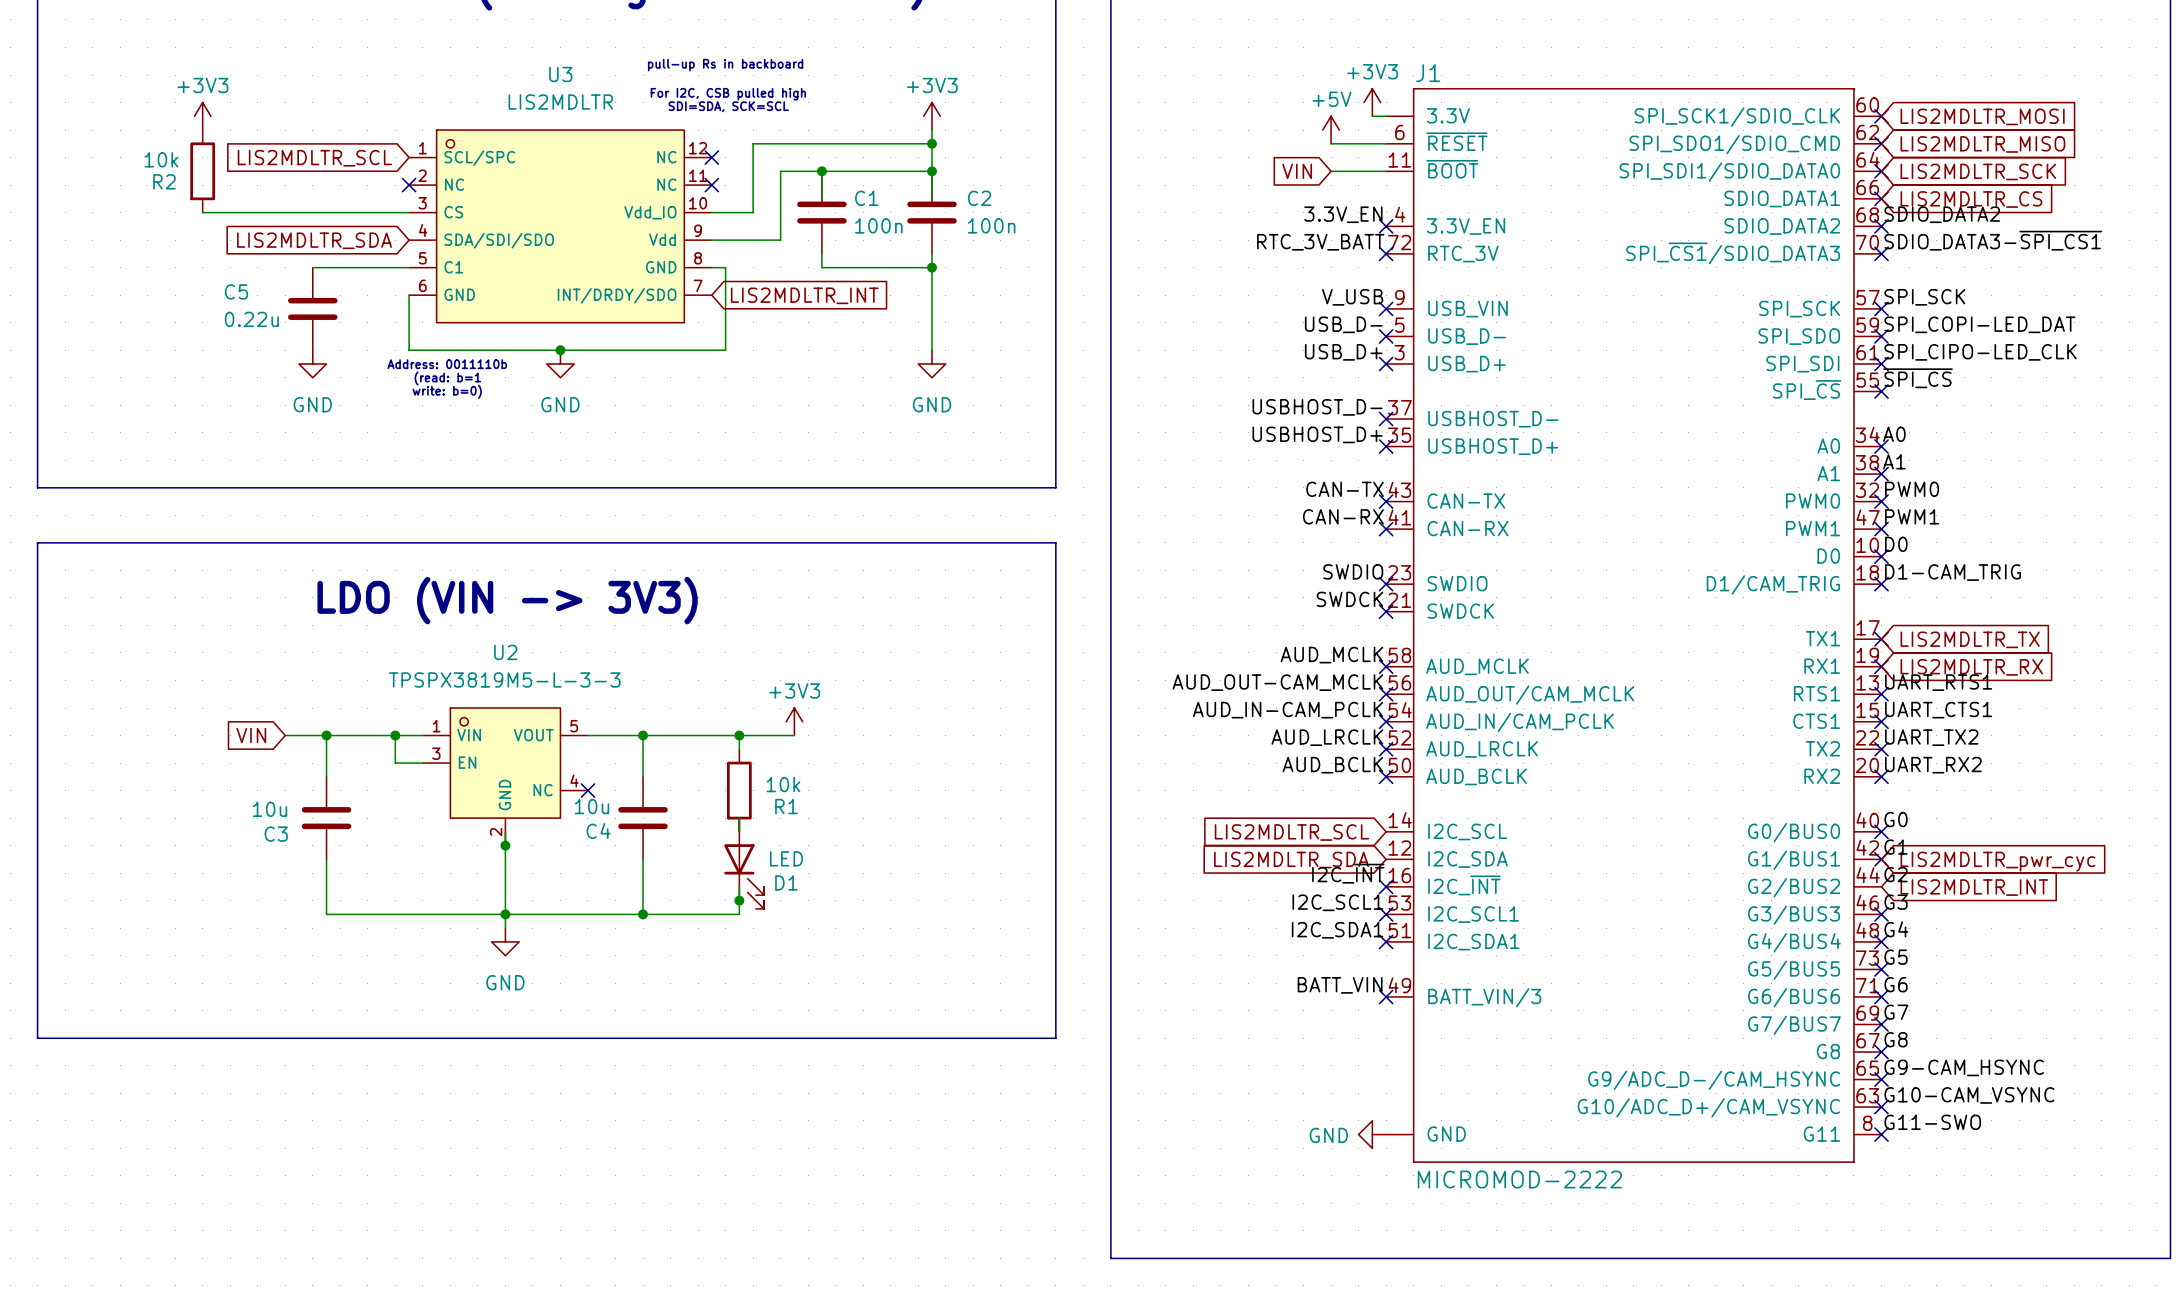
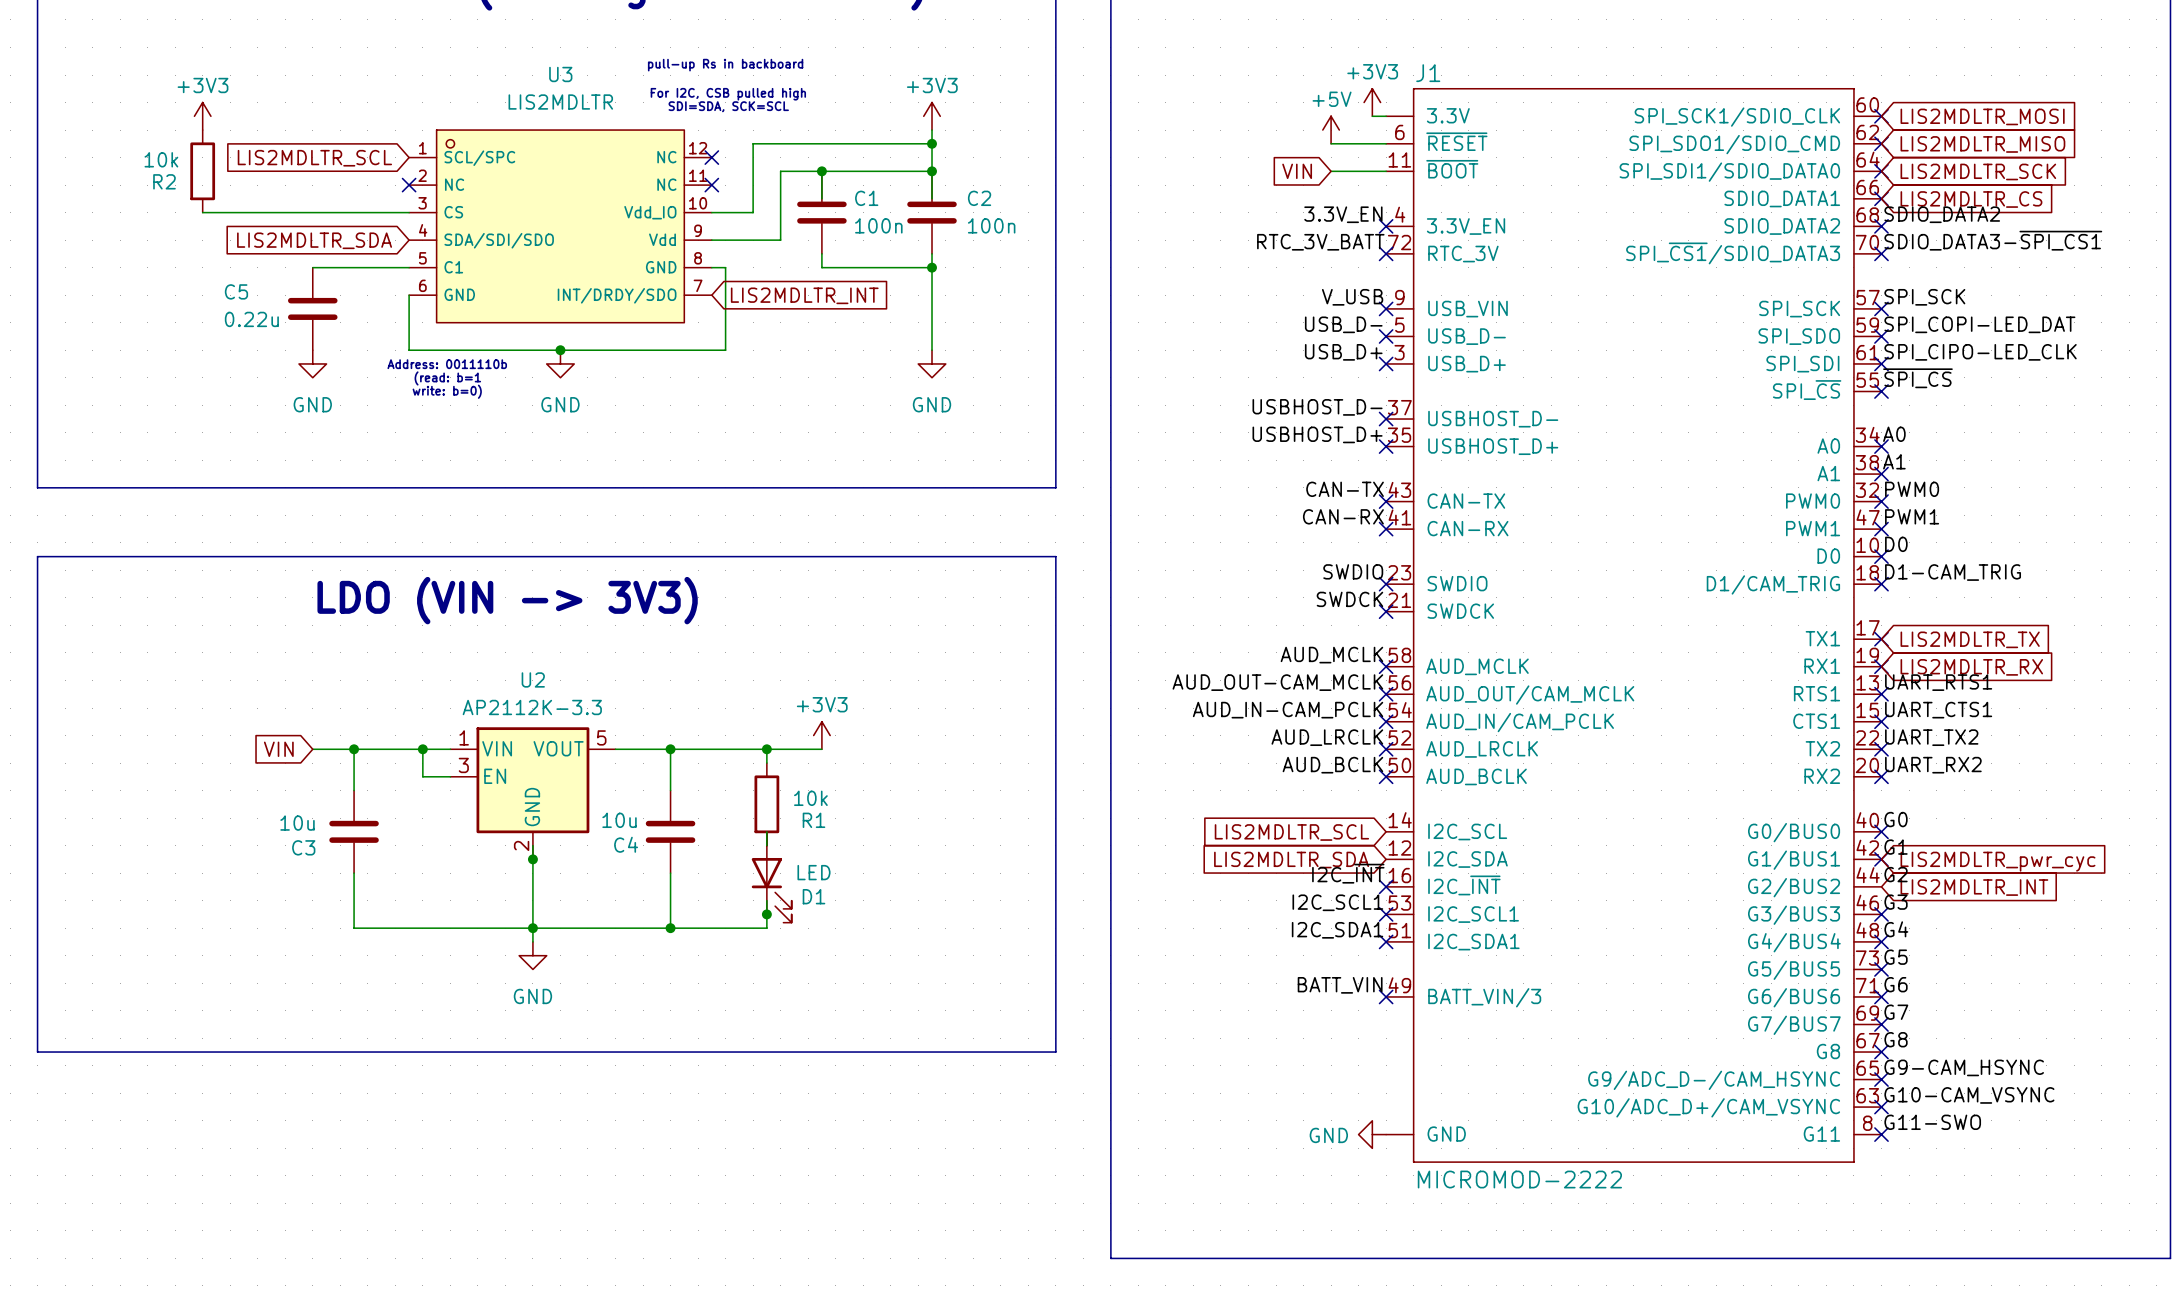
line: (37, 556) (37, 542) (1055, 542) (1055, 556) -> (37, 556) (1055, 556)
U2 value: TPSPX3819M5-L-3-3 (504, 679) -> AP2112K-3.3 (532, 707)
U2 symbol: [422, 708, 588, 846] -> [450, 727, 616, 860]
power symbol position: +3V3 (794, 721) -> +3V3 (821, 735)
global label position: VIN (251, 735) -> VIN (278, 749)
wire: (285, 735) (422, 735) -> (312, 749) (450, 749)
wire: (326, 735) (326, 776) -> (354, 749) (354, 790)
junction: (326, 735) -> none
wire: (395, 735) (395, 763) (422, 763) -> (422, 749) (422, 776) (450, 776)
junction: (395, 735) -> none
wire: (587, 735) (794, 735) -> (615, 749) (821, 749)
wire: (643, 735) (643, 776) -> (670, 749) (670, 790)
junction position: (643, 735) -> (670, 749)
wire: (739, 735) (739, 749) -> (766, 749) (766, 763)
junction position: (739, 735) -> (766, 749)
junction: none -> (354, 749)
junction: none -> (422, 749)
no-connect mark: (587, 790) -> none
R1 position: (739, 790) -> (766, 804)
C3 position: (326, 818) -> (354, 831)
C4 position: (643, 818) -> (670, 831)
wire: (739, 818) (739, 831) -> (766, 831) (766, 845)
wire: (505, 831) (505, 928) -> (532, 845) (532, 941)
junction: (505, 845) -> none
wire: (326, 859) (326, 914) (739, 914) (739, 886) -> (354, 873) (354, 928) (766, 928) (766, 900)
junction: none -> (532, 859)
wire: (643, 859) (643, 914) -> (670, 873) (670, 928)
D1 position: (744, 863) -> (771, 877)
junction position: (739, 900) -> (766, 914)
junction: (505, 914) -> none
junction position: (643, 914) -> (670, 928)
junction: none -> (532, 928)
power symbol position: GND (505, 941) -> GND (532, 955)
line: (37, 1038) (1055, 1038) -> (37, 1038) (37, 1052) (1055, 1052) (1055, 1038)

